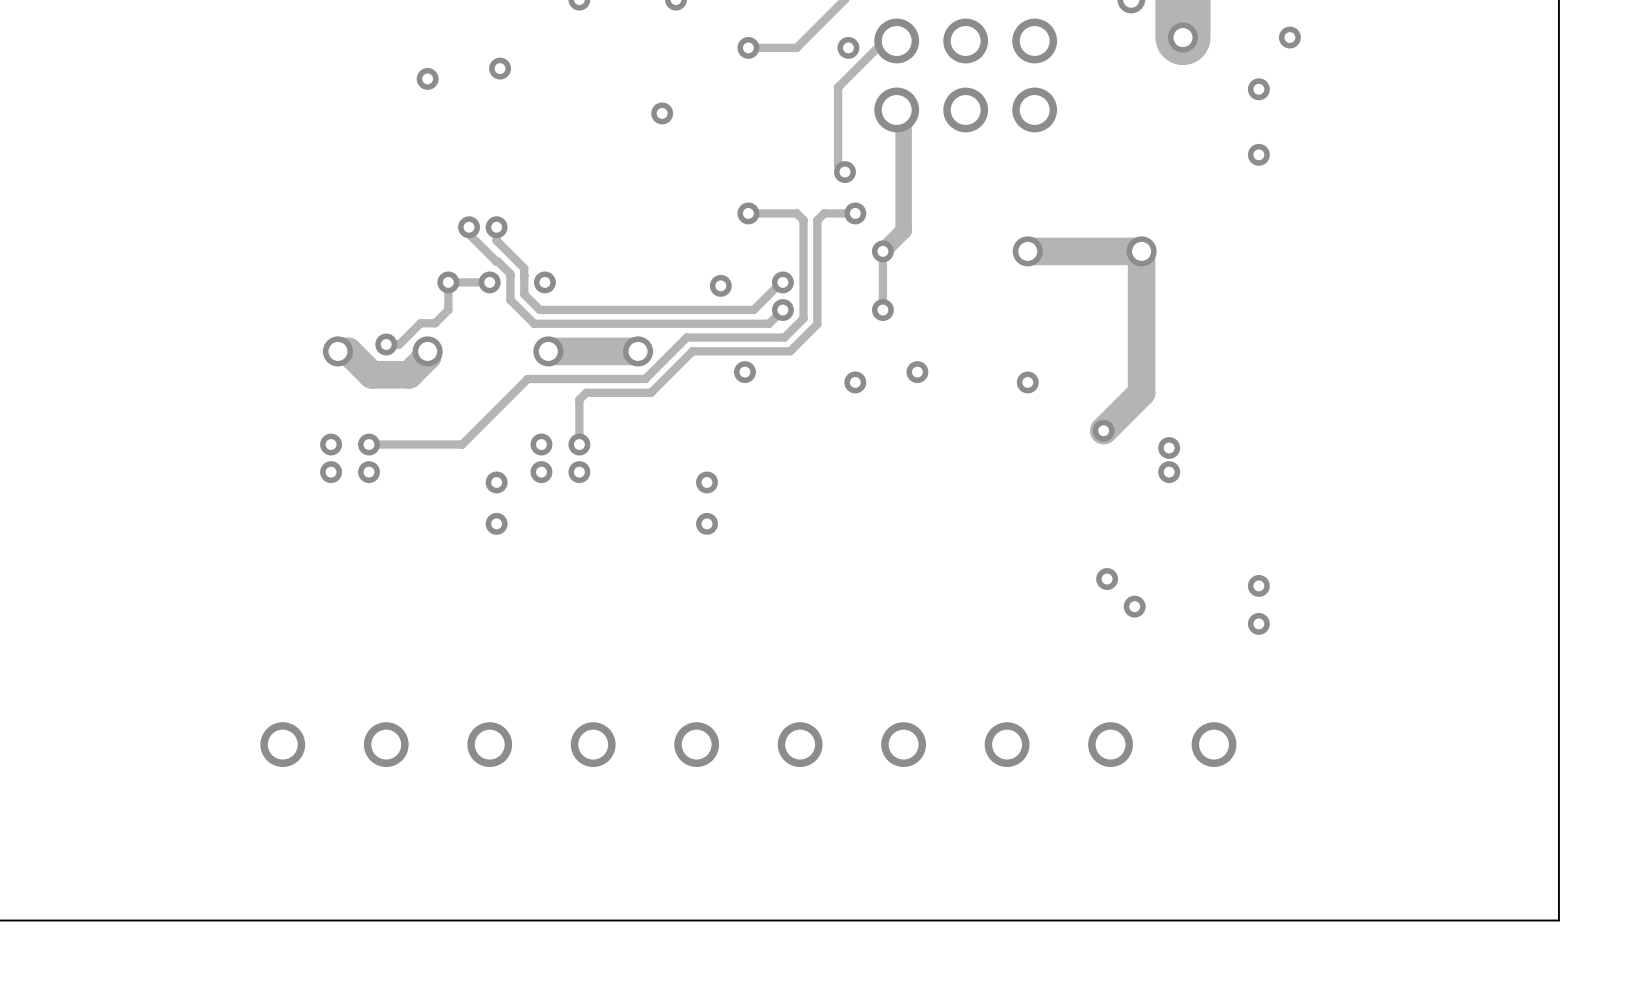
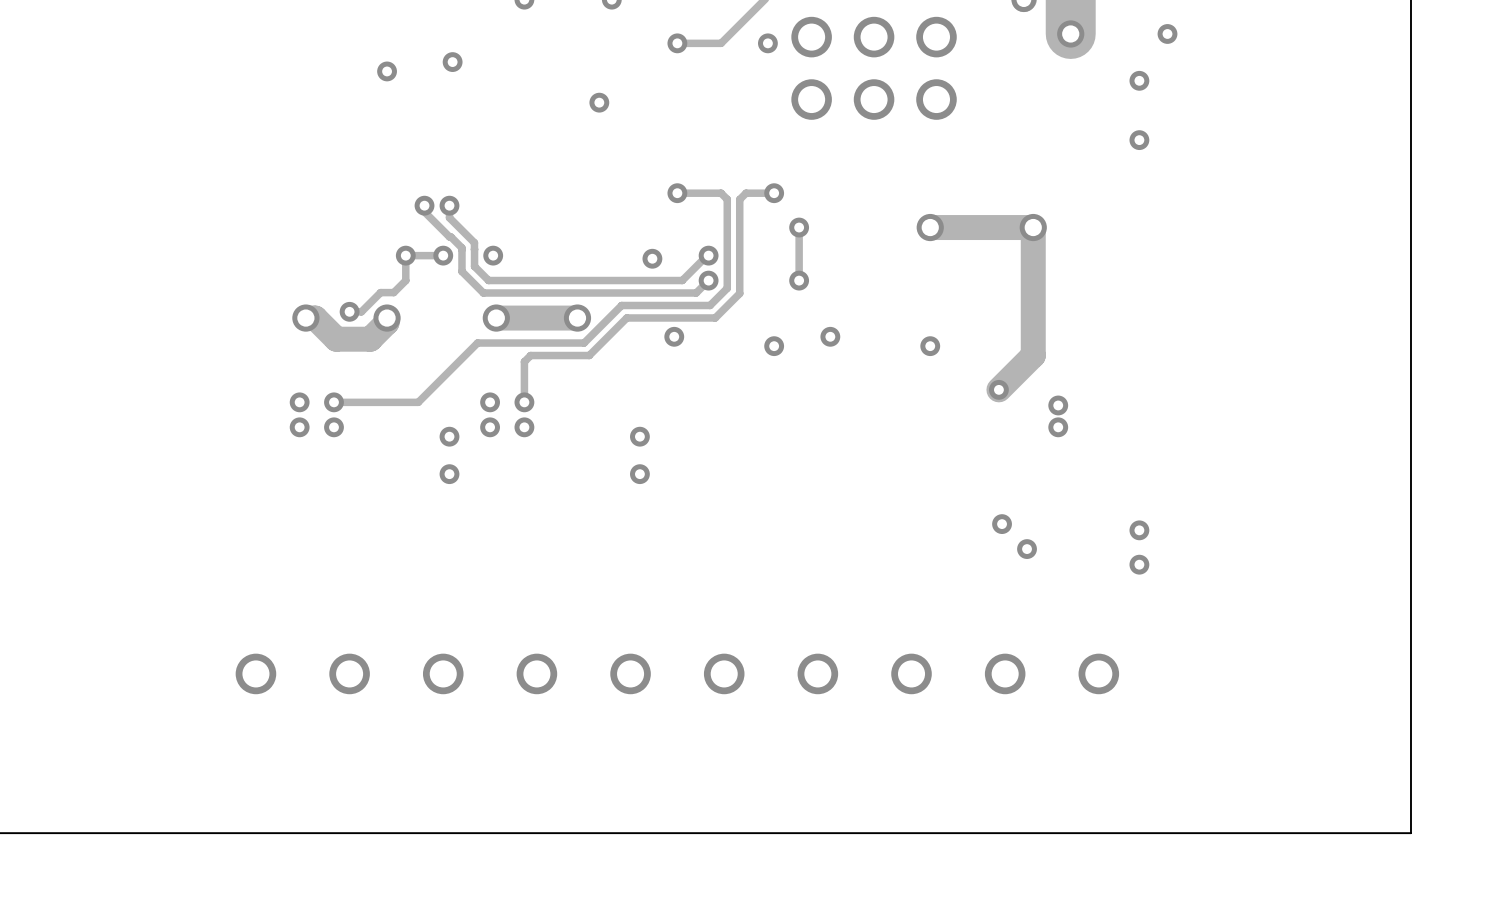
track: (896, 40) (884, 40) (838, 87) (838, 165) (844, 172) -> none
track: (896, 109) (903, 116) (903, 230) (882, 251) -> none
via: (844, 172) -> none

